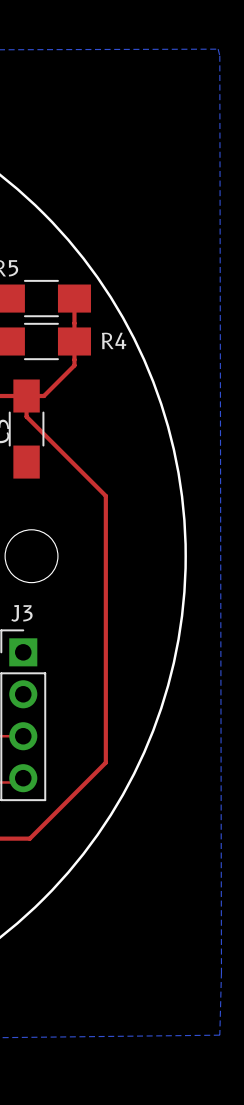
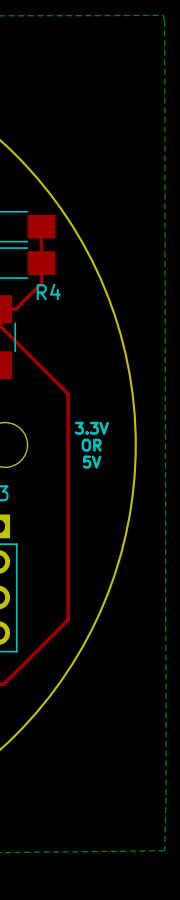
R4 name position: R4 (114, 340) -> R4 (48, 291)
text: none -> 3.3V (91, 428)
text: none -> OR (91, 445)
text: none -> 5V (92, 462)

